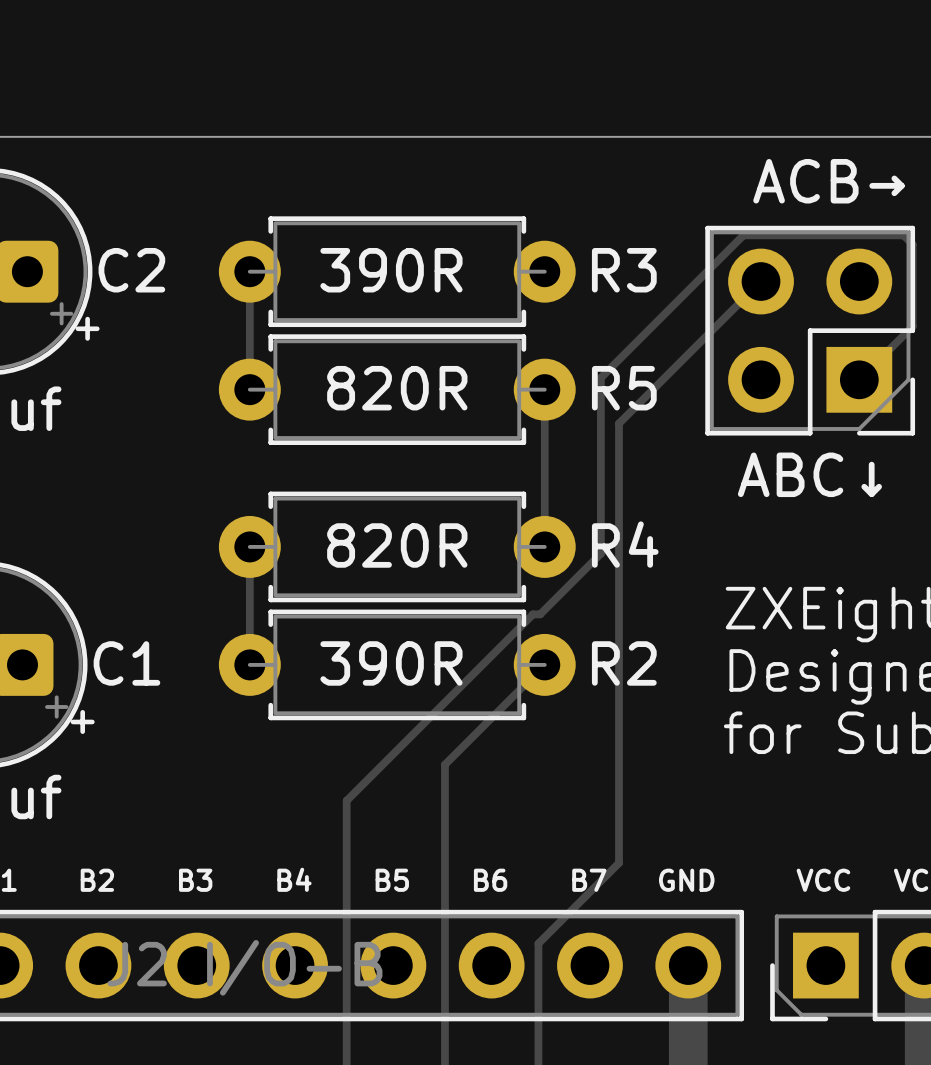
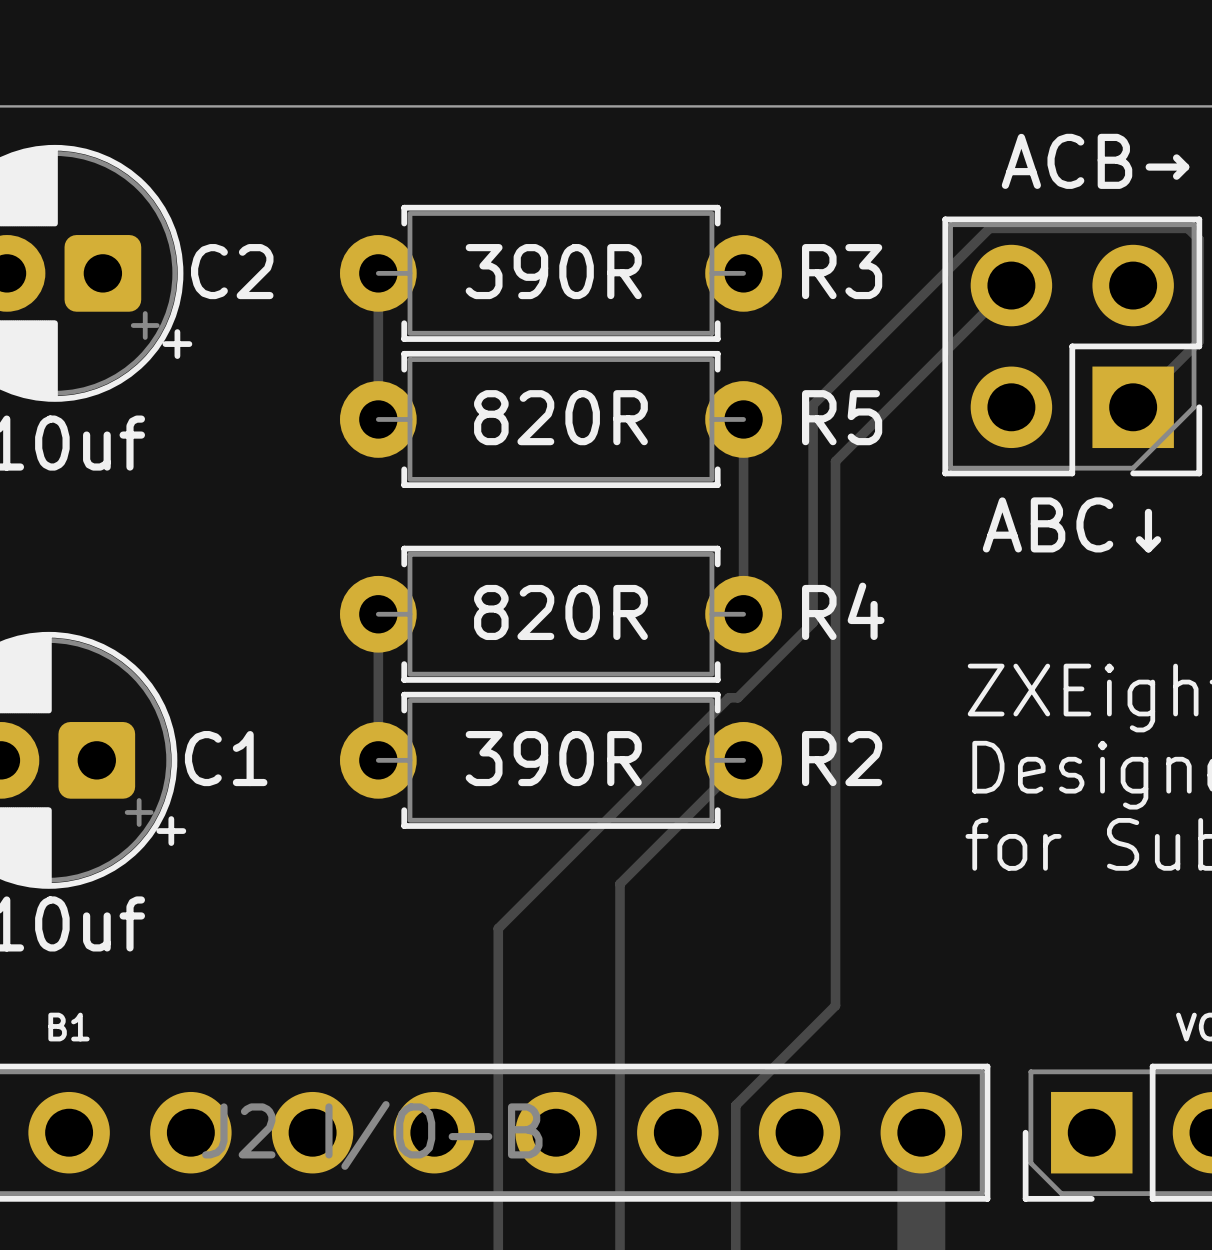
text: B4 (294, 879) -> none
text: B2 (97, 880) -> none
text: B3 (195, 880) -> none
text: B5 (392, 880) -> none
text: B6 (490, 880) -> none
text: B7 (589, 880) -> none
text: GND (686, 880) -> none
text: VCC (823, 880) -> none

